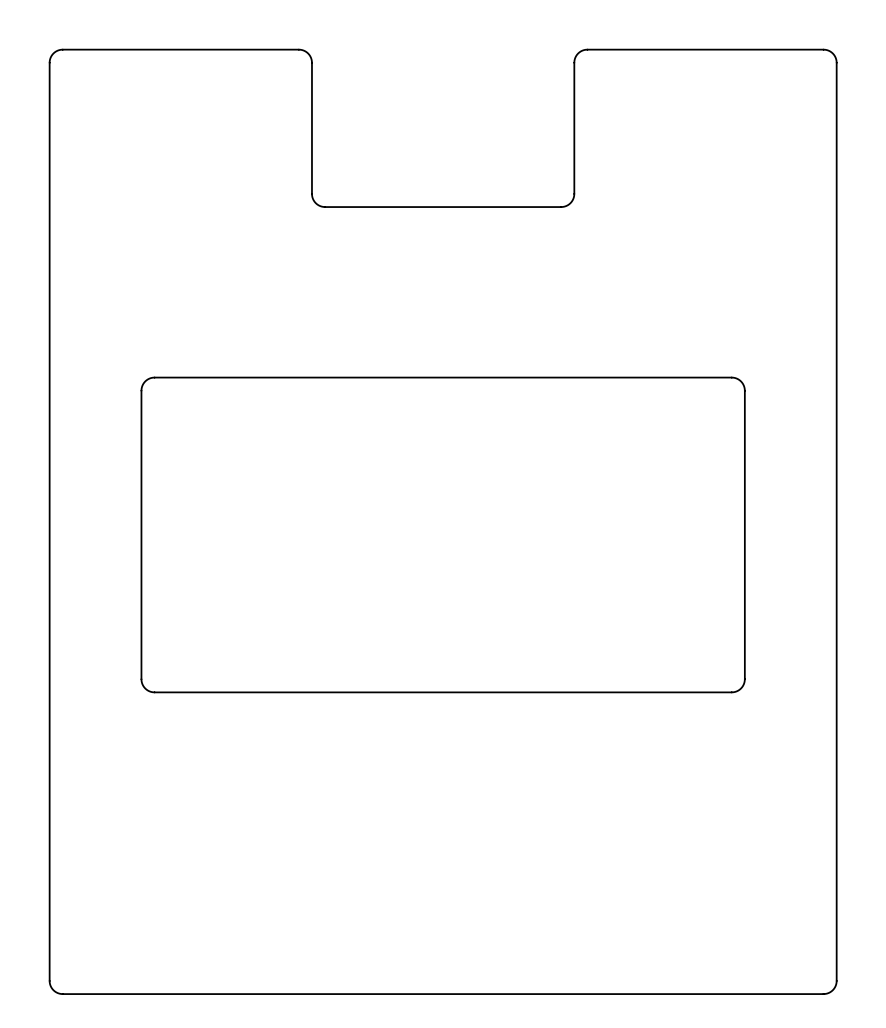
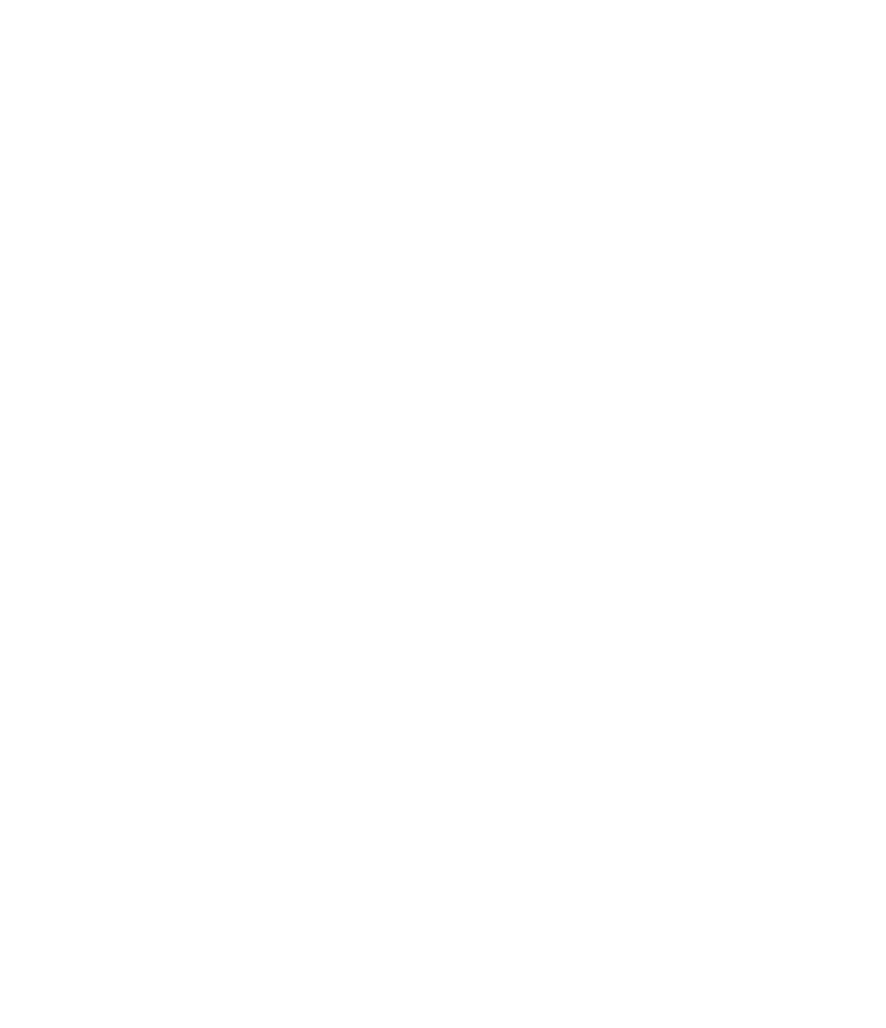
board edge: (62, 49) (298, 49) (305, 51) (310, 56) (311, 62) (312, 195) (317, 204) (325, 207) (561, 207) (567, 205) (572, 200) (574, 193) (574, 61) (578, 53) (584, 50) (823, 49) (833, 54) (836, 62) (836, 980) (831, 991) (823, 994) (62, 994) (52, 988) (49, 980) (49, 62) (53, 53) (62, 49) -> none
board edge: (154, 377) (731, 377) (738, 379) (743, 384) (744, 390) (744, 679) (743, 685) (738, 690) (731, 692) (154, 692) (148, 690) (143, 685) (141, 679) (141, 390) (145, 381) (154, 377) -> none

